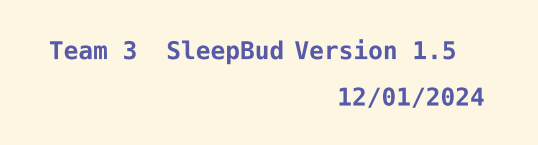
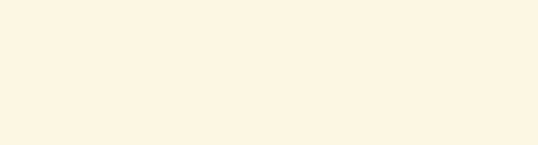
text: Version 1.5 (375, 49) -> none
text: Team 3 (92, 50) -> none
text: SleepBud (225, 52) -> none
text: 12/01/2024 (411, 97) -> none

